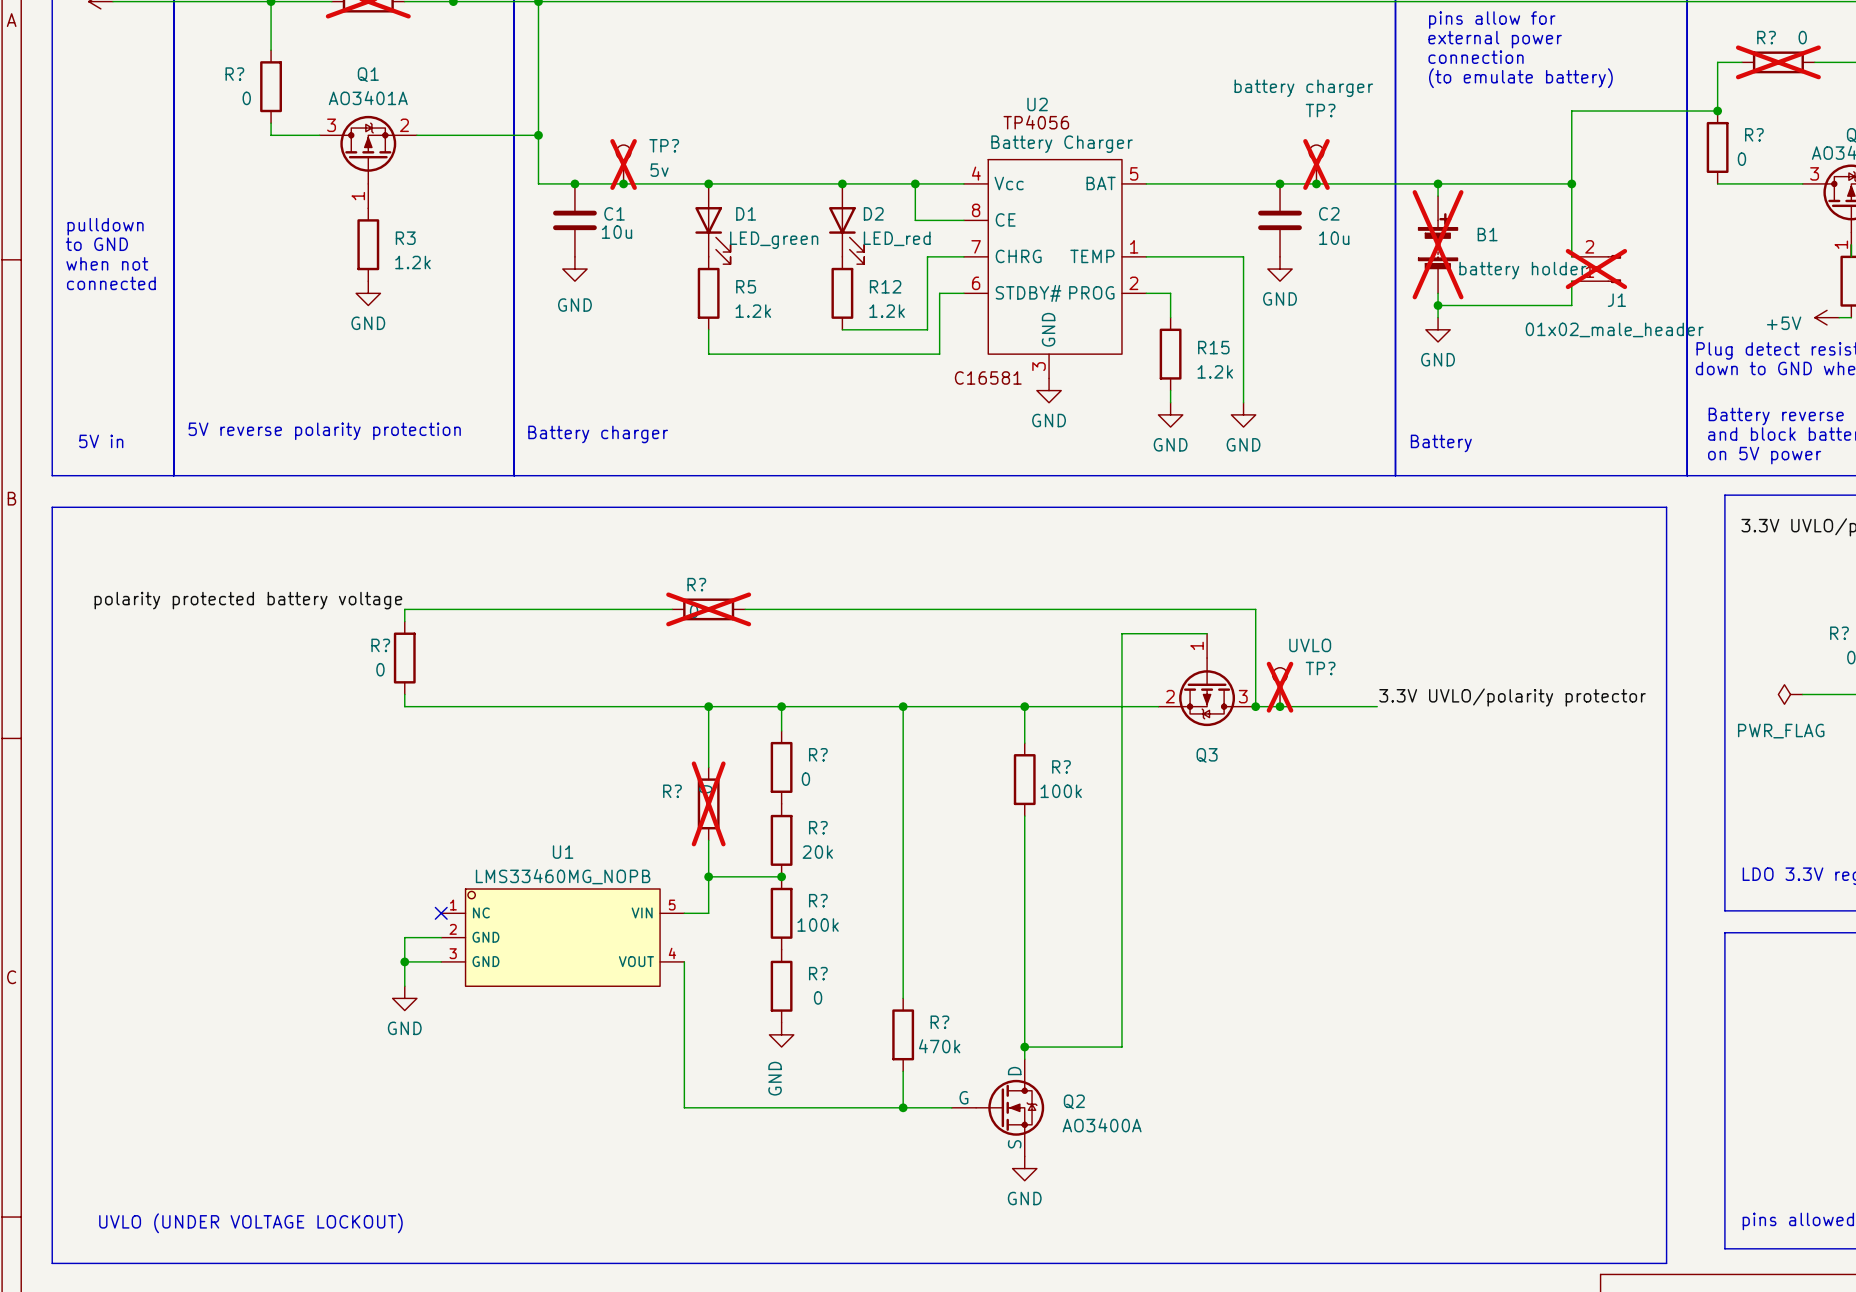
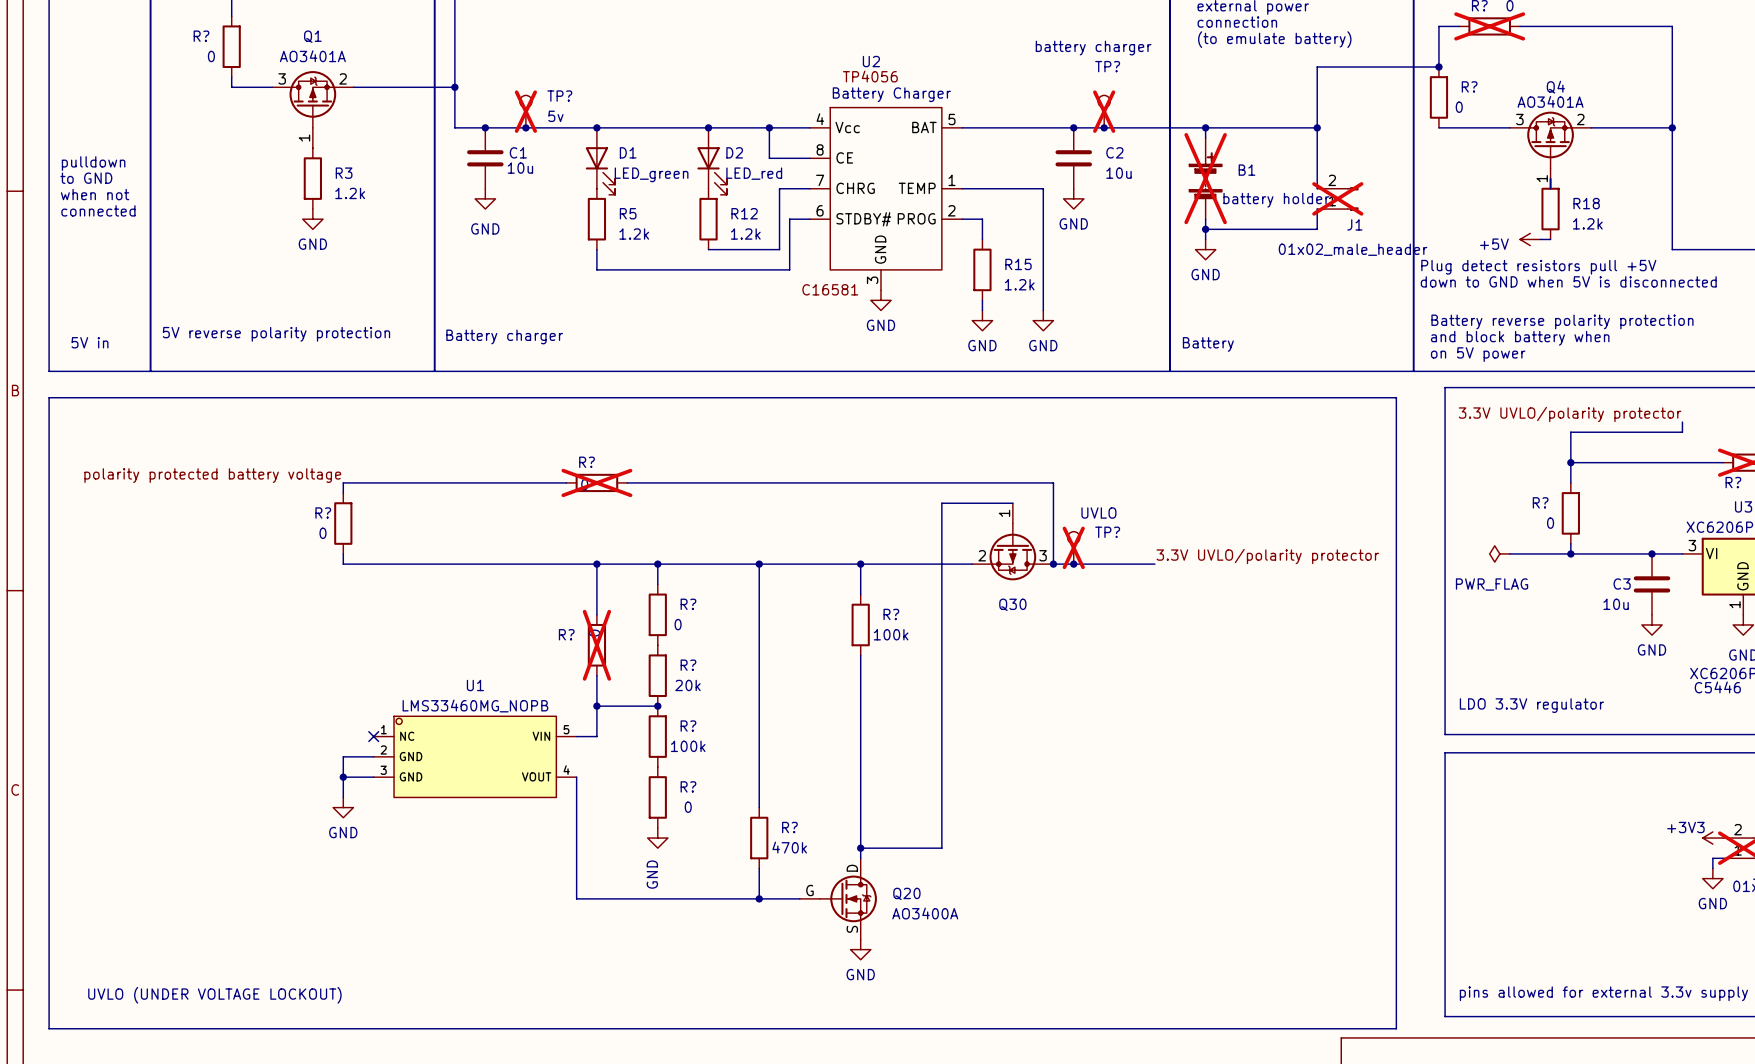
Q3 name: Q3 (1207, 755) -> Q30 (1012, 604)
Q2 name: Q2 (1074, 1101) -> Q20 (906, 893)

